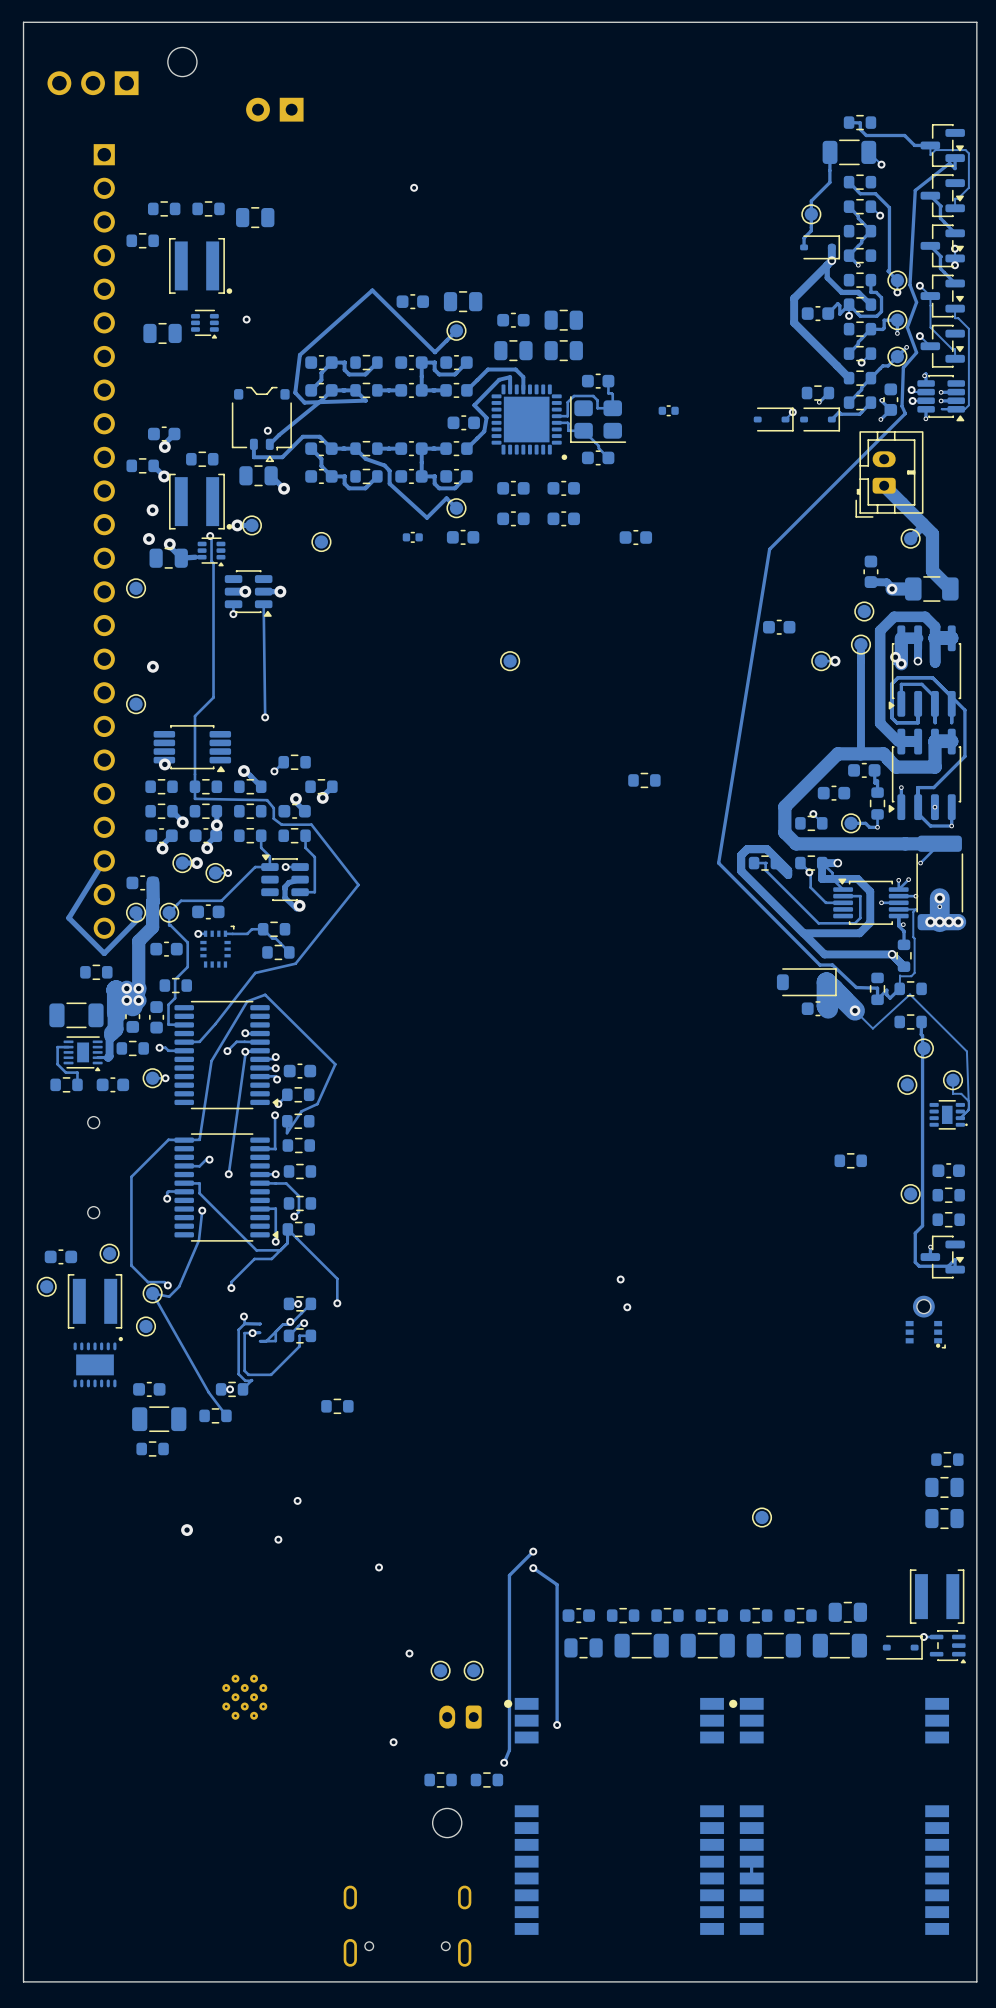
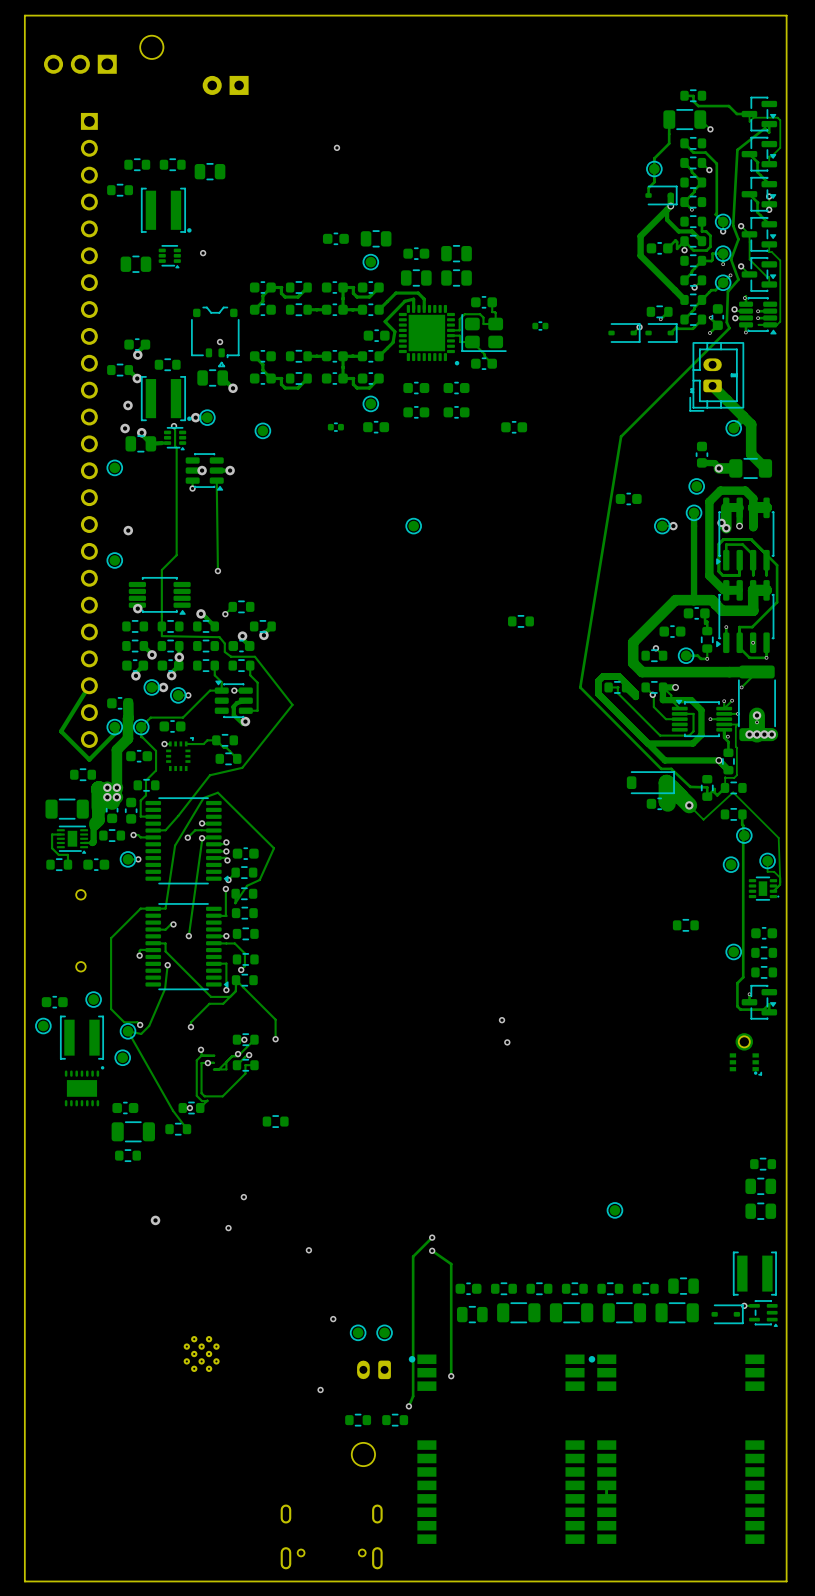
track: (456, 330) (434, 352) (372, 290) (299, 354) (295, 392) (304, 402) (365, 400) (355, 390) (331, 390) (321, 400) (279, 435) (269, 444) -> none
track: (253, 444) (253, 457) (282, 457) (302, 436) (319, 436) (331, 448) (355, 448) (365, 458) (384, 465) (389, 470) (389, 483) (427, 517) (446, 498) (456, 508) -> none

